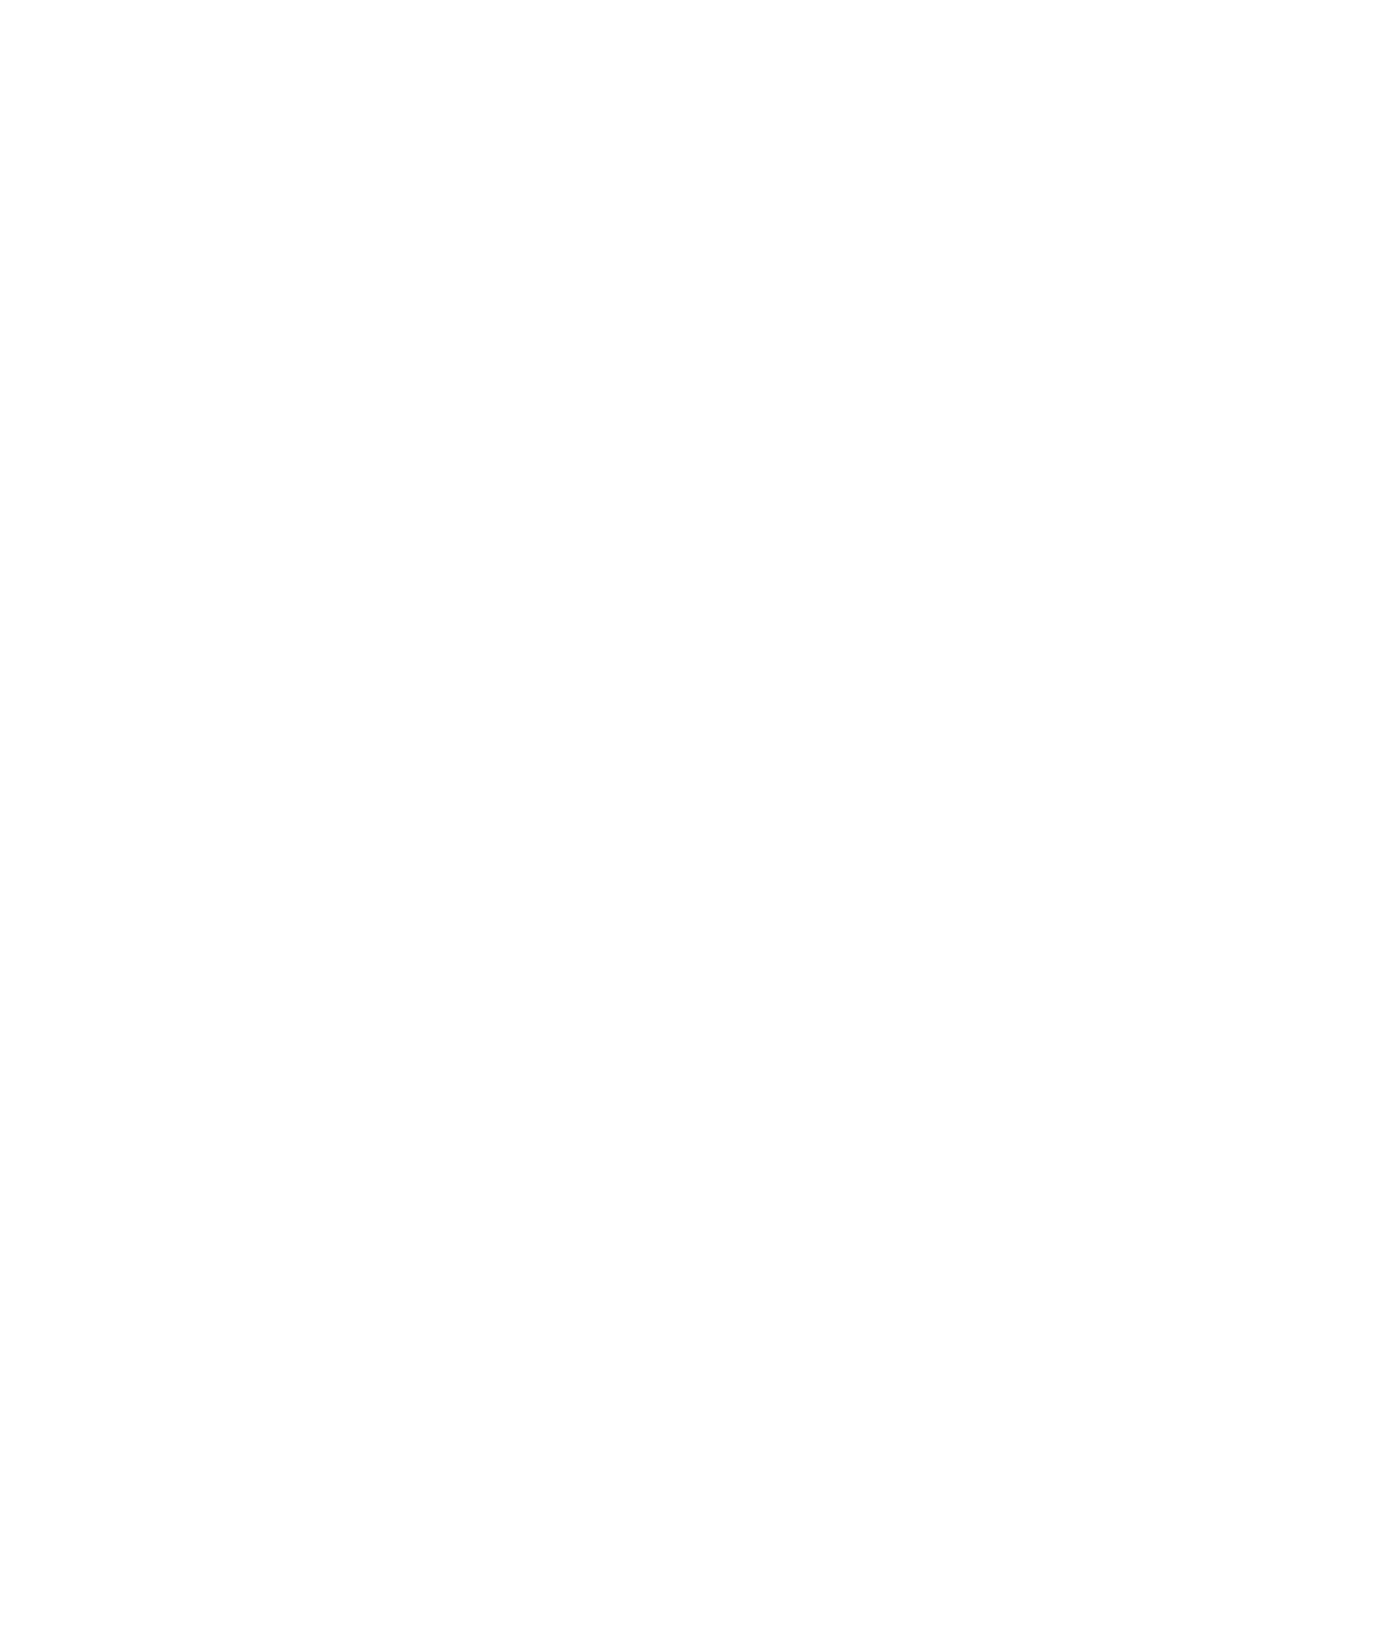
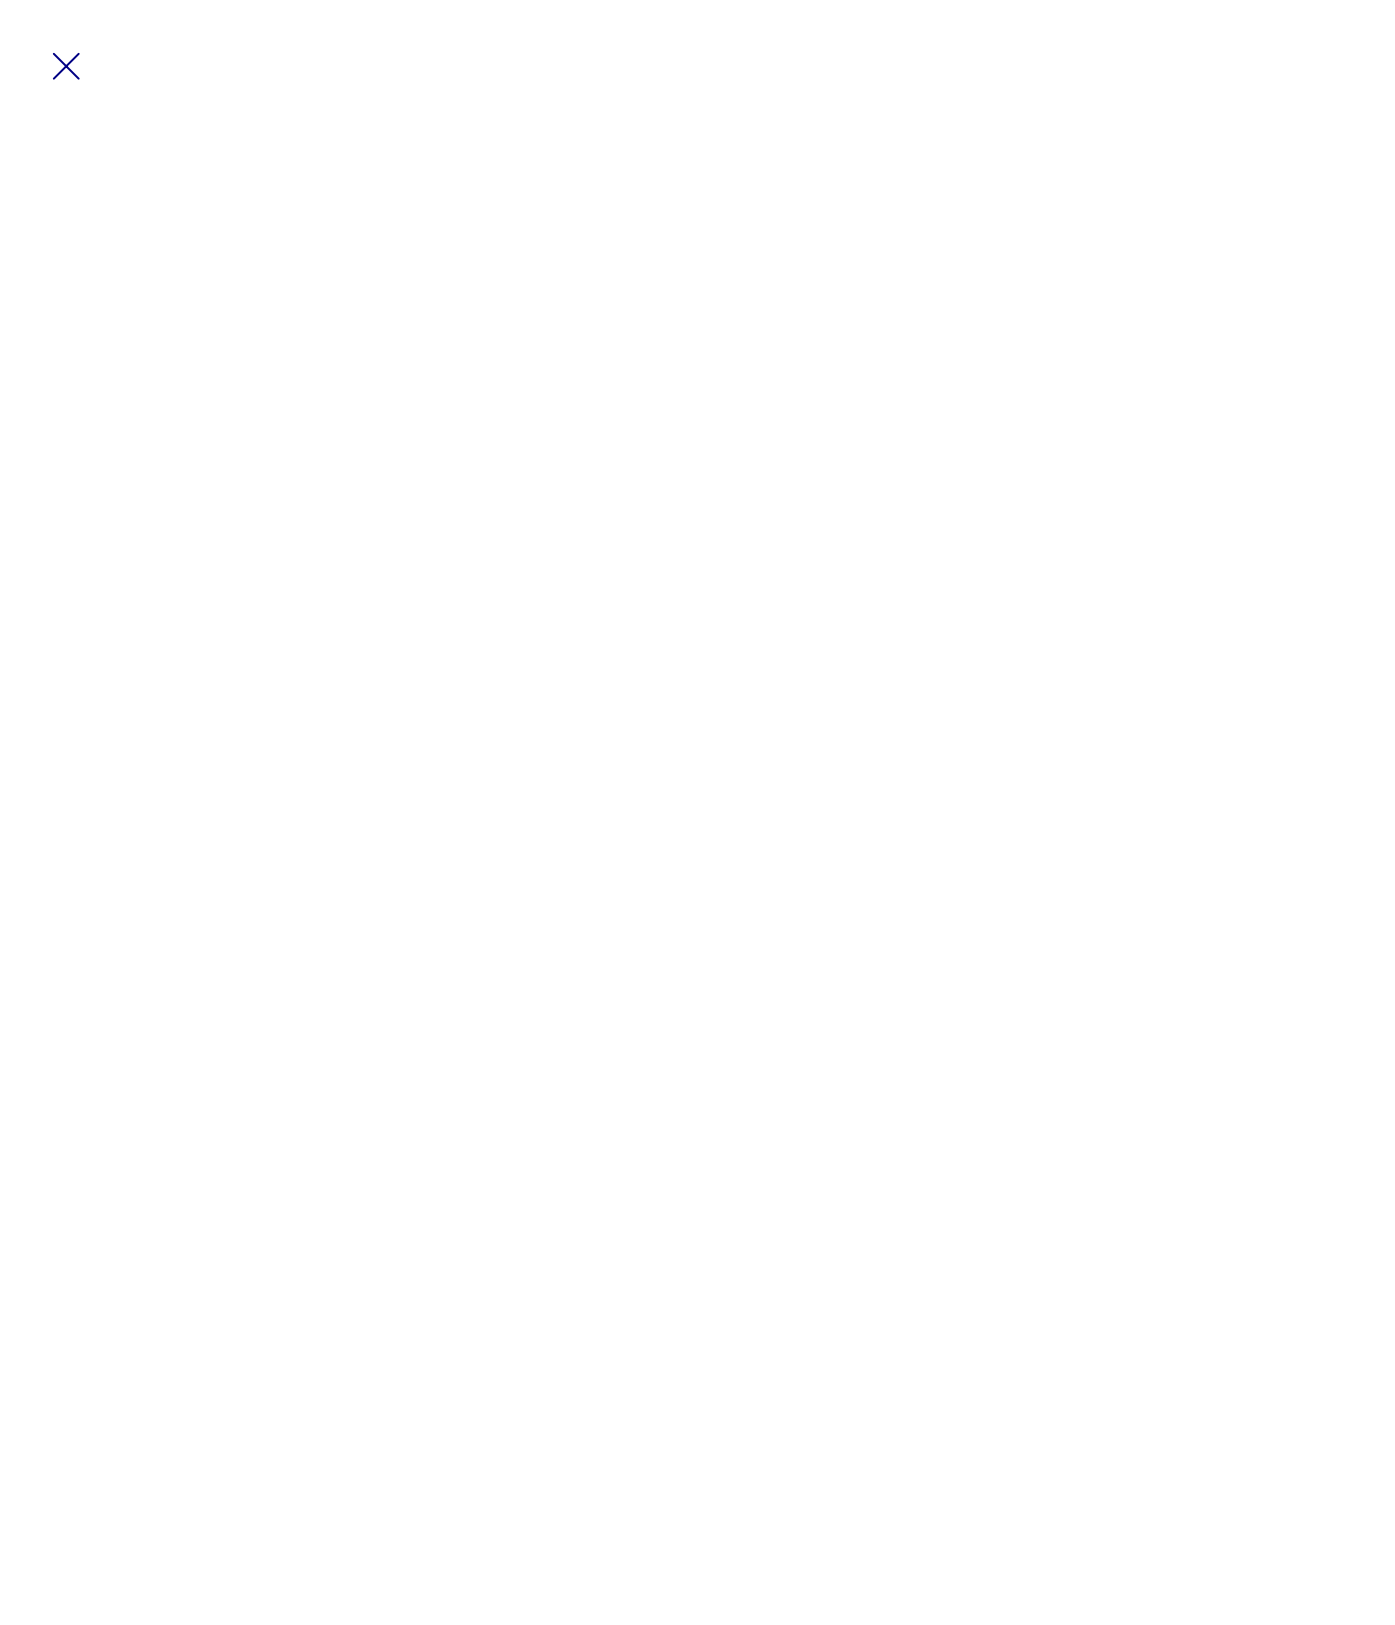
no-connect mark: none -> (66, 66)

